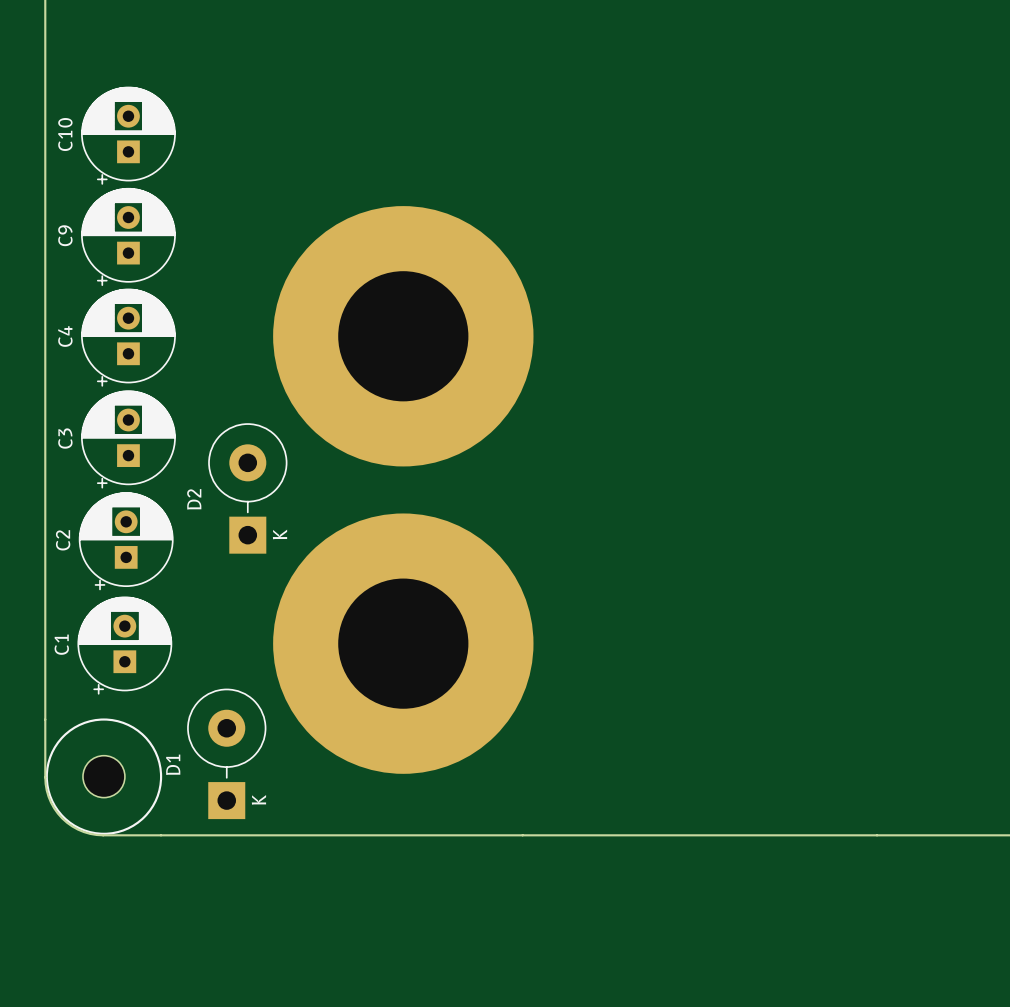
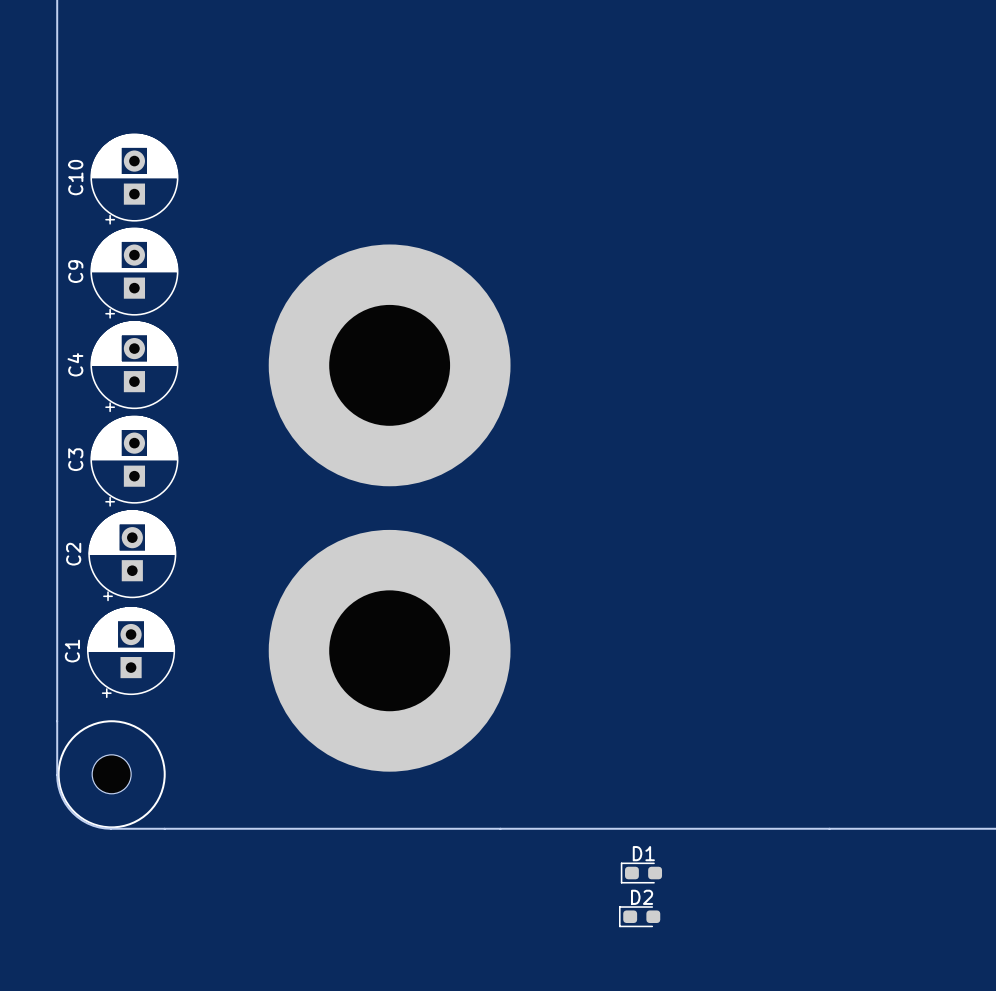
D2 footprint: [208, 423, 288, 554] -> [619, 906, 661, 928]
D2 name position: D2 (194, 499) -> D2 (642, 897)
D1 footprint: [187, 688, 267, 820] -> [620, 862, 663, 884]
D1 name position: D1 (173, 764) -> D1 (643, 853)

